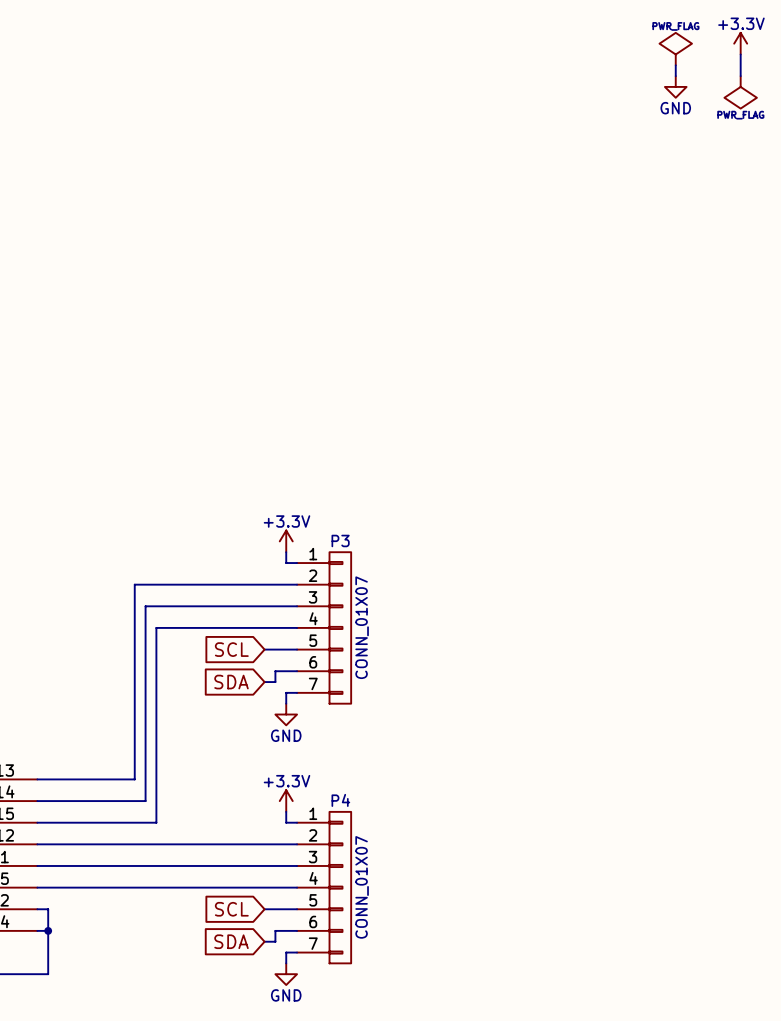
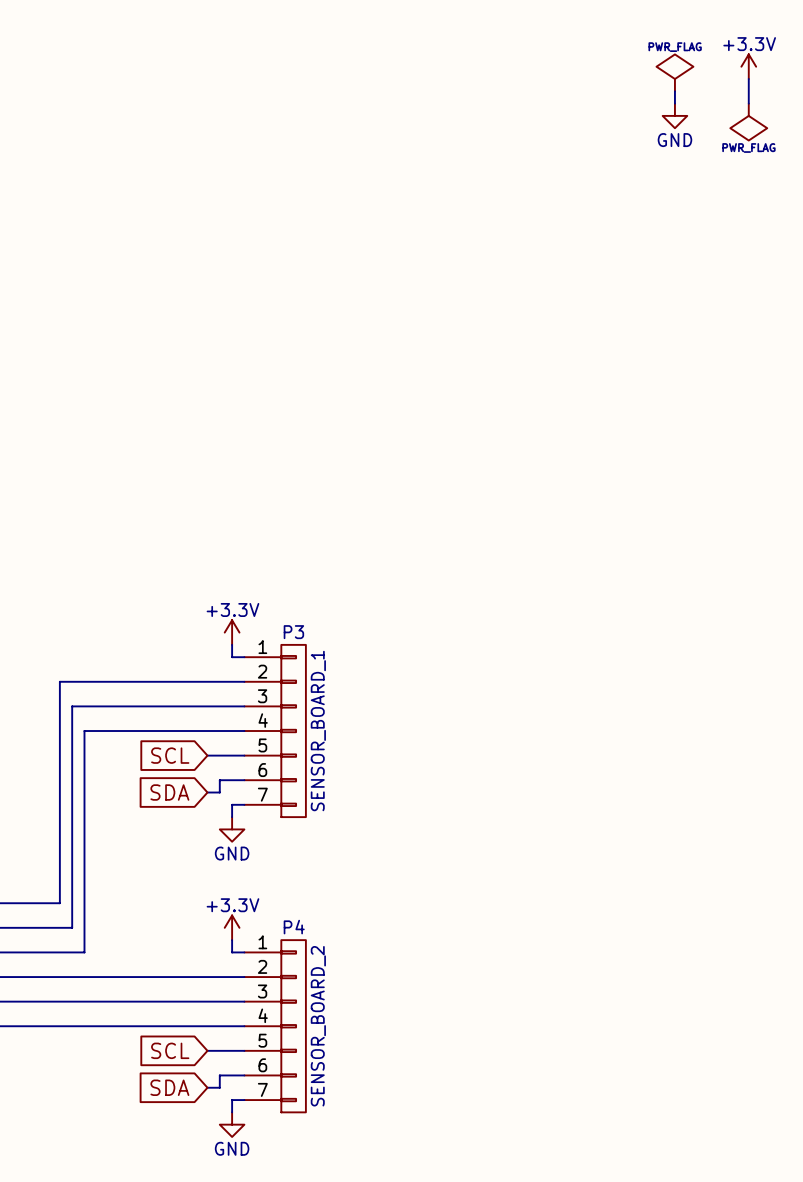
P3 value: CONN_01X07 (362, 627) -> SENSOR_BOARD_1 (318, 731)
P4 value: CONN_01X07 (362, 887) -> SENSOR_BOARD_2 (318, 1026)

